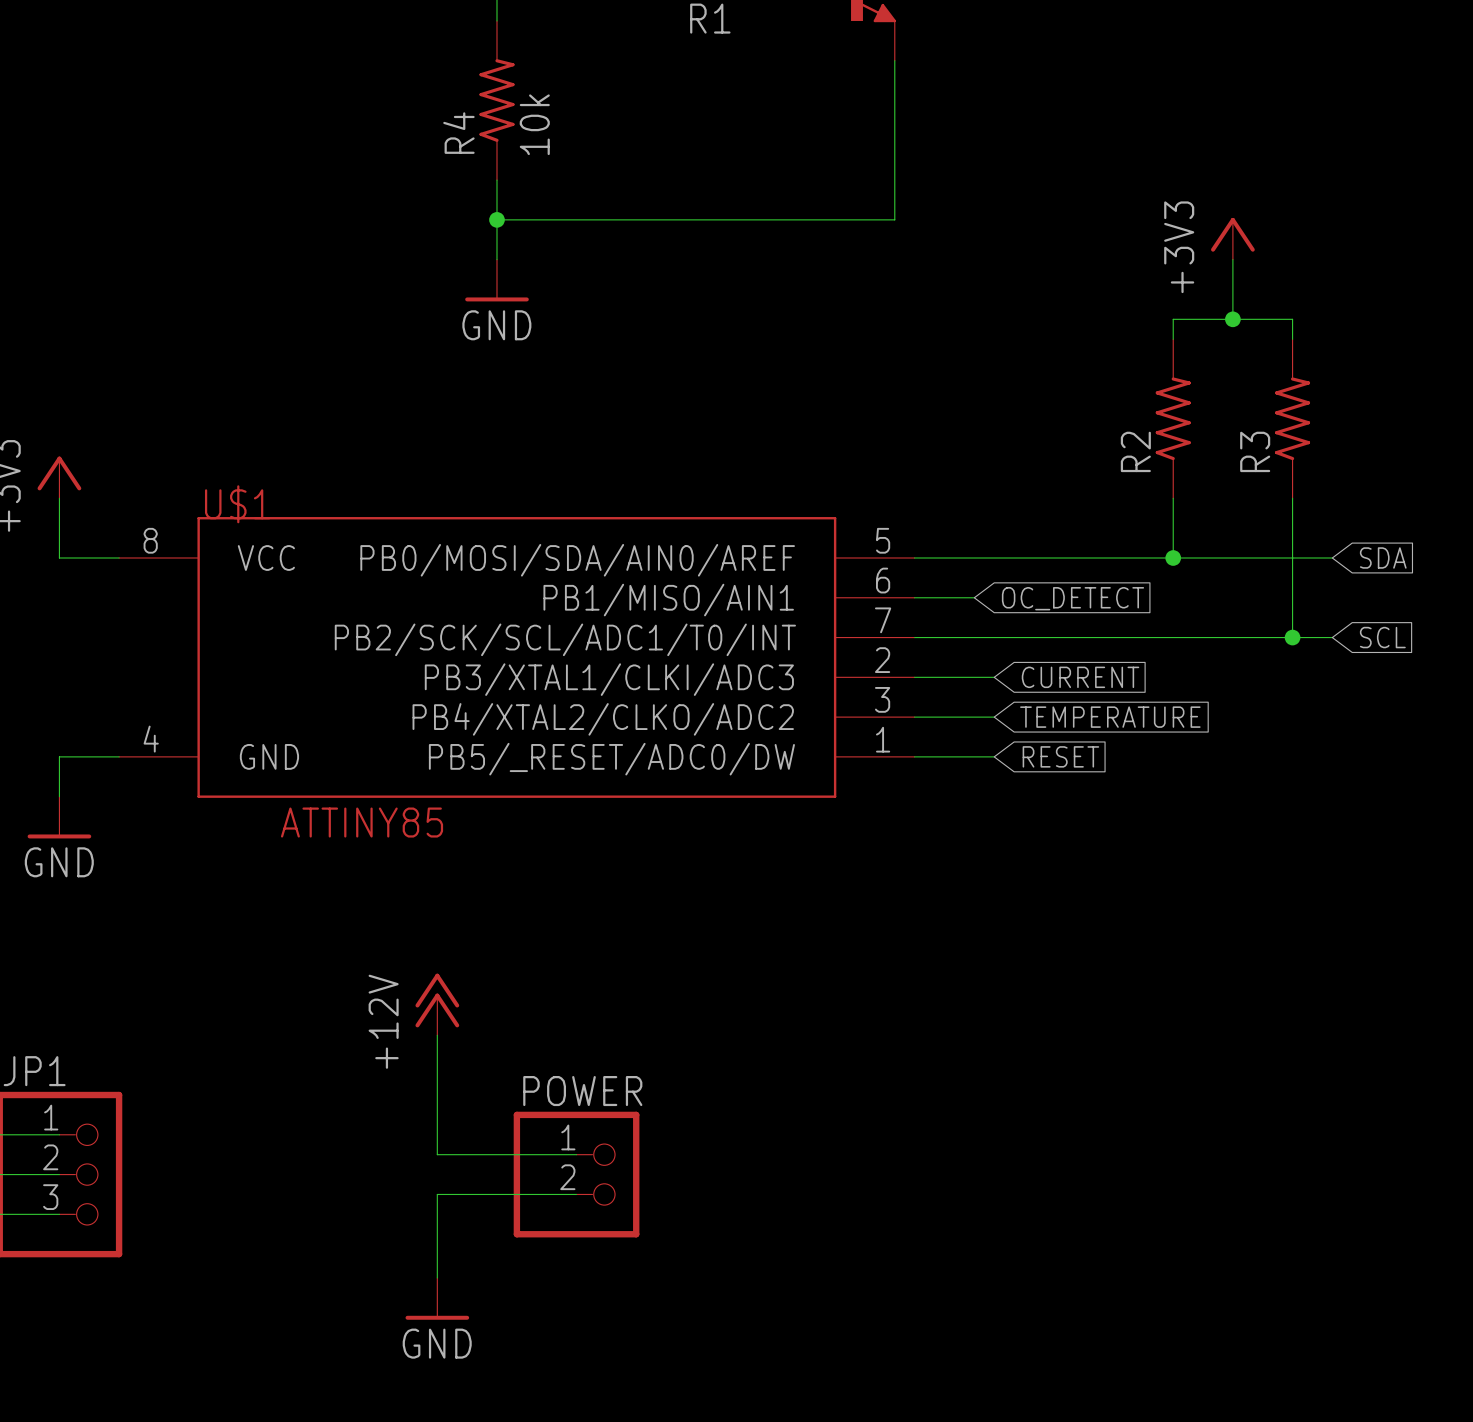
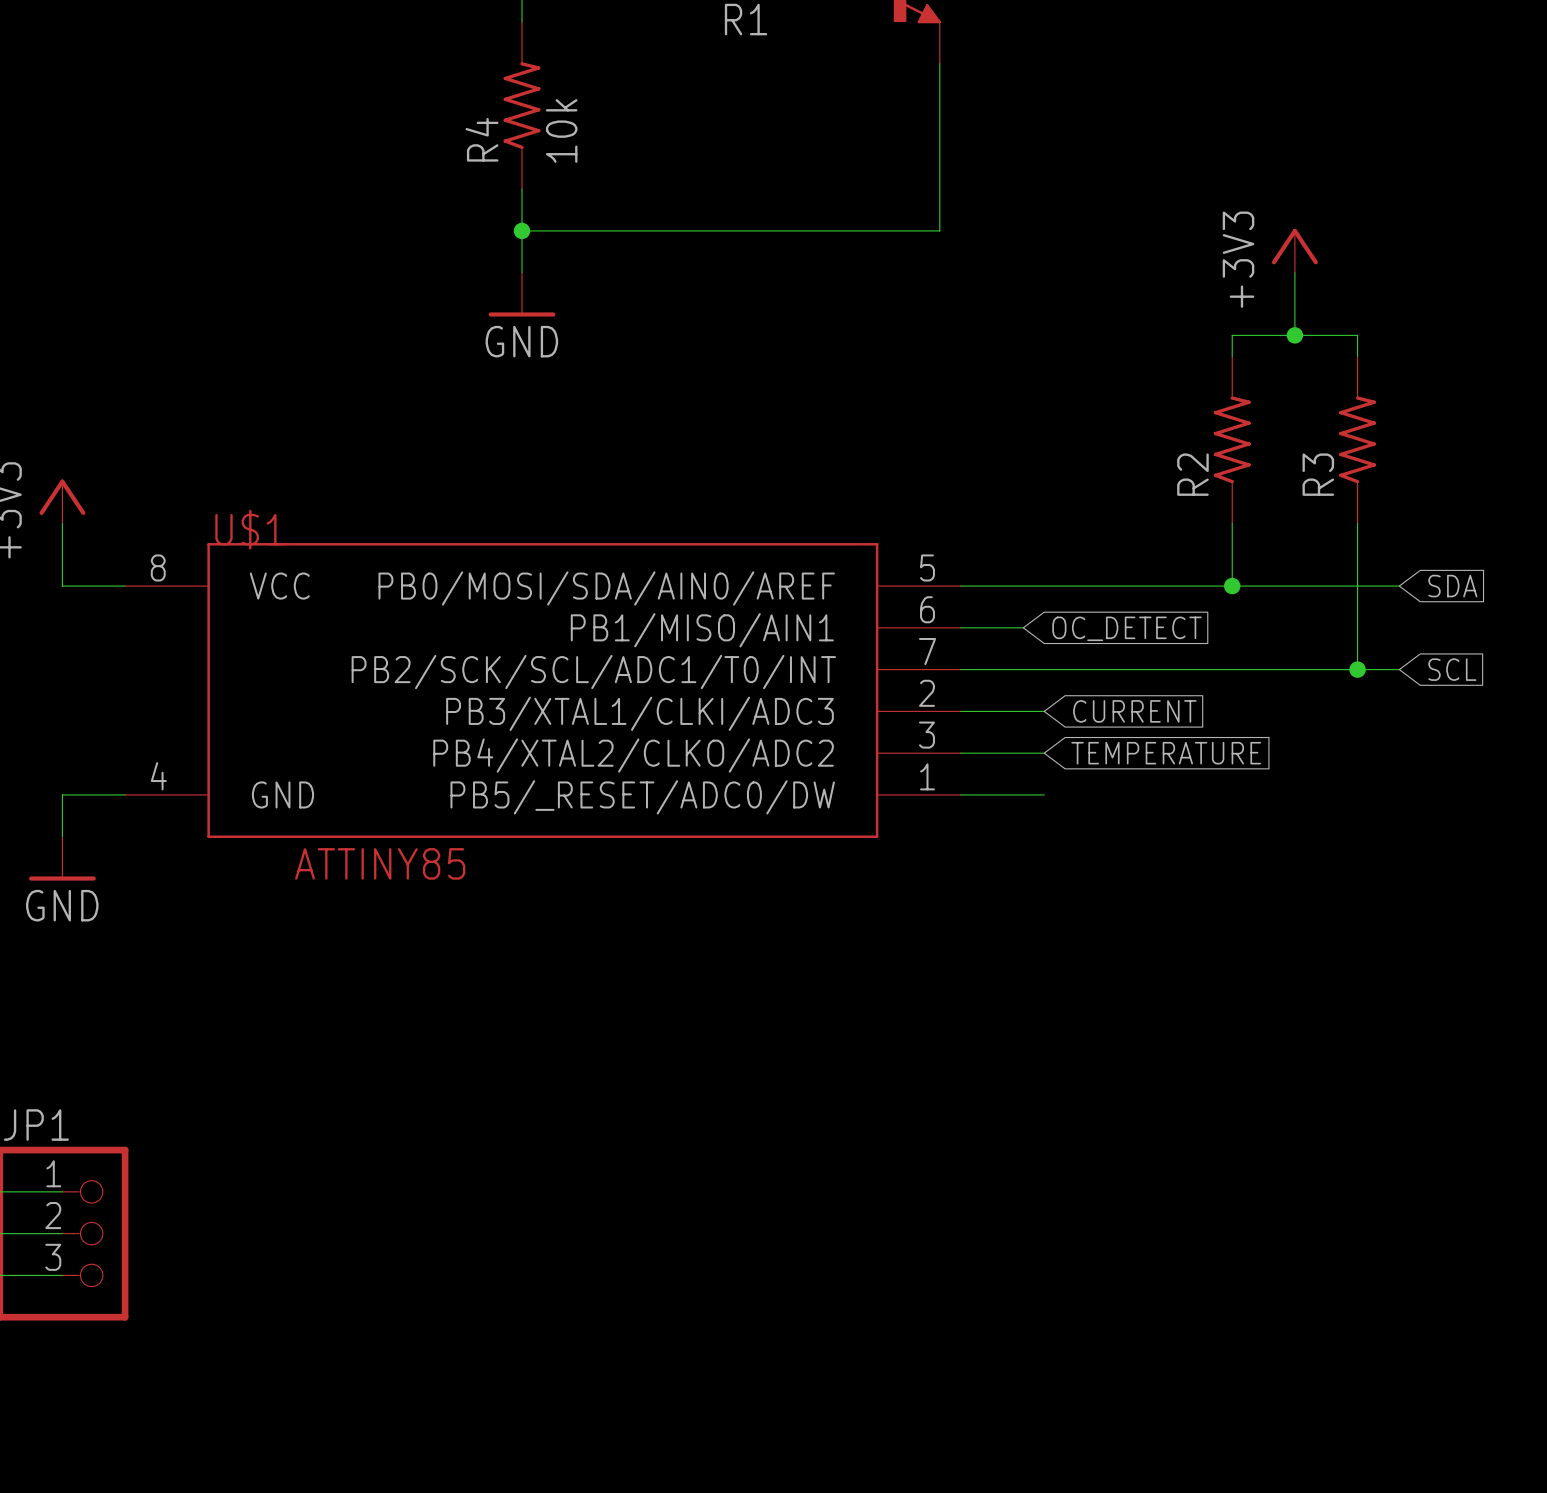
global label: RESET (1060, 756) -> none
power symbol: +12V (437, 1004) -> none
wire: (437, 1035) (437, 1154) (576, 1154) -> none
POWER: (576, 1174) -> none
wire: (576, 1194) (437, 1194) (437, 1277) -> none
power symbol: GND (437, 1298) -> none

